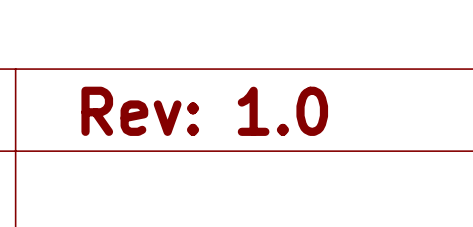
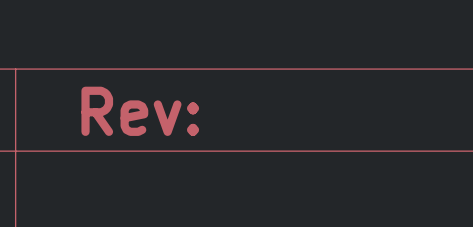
title block: Rev: 1.0 (204, 111) -> Rev: (140, 111)

